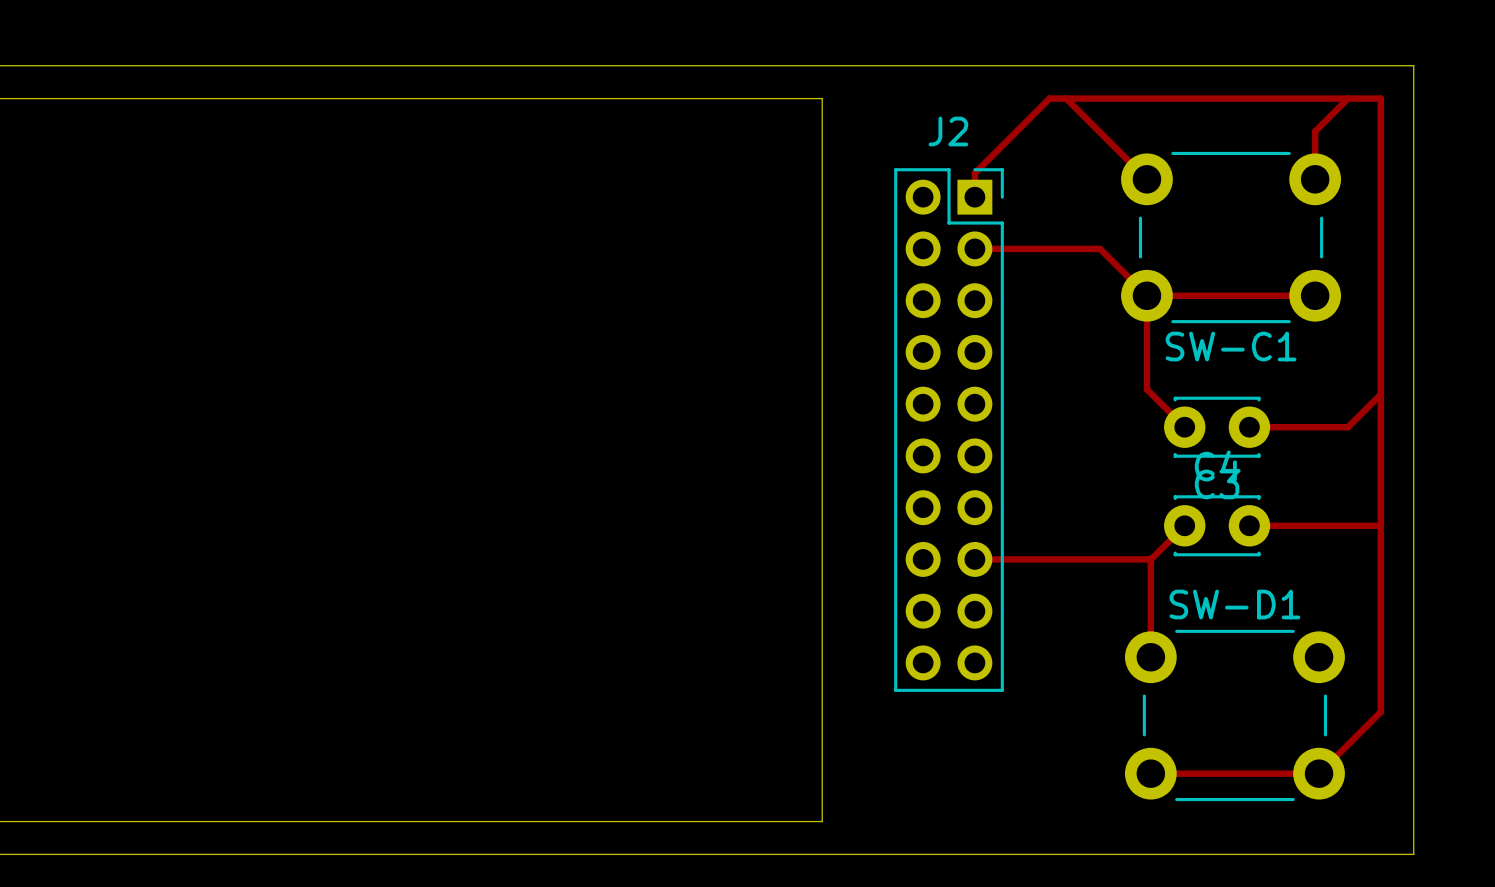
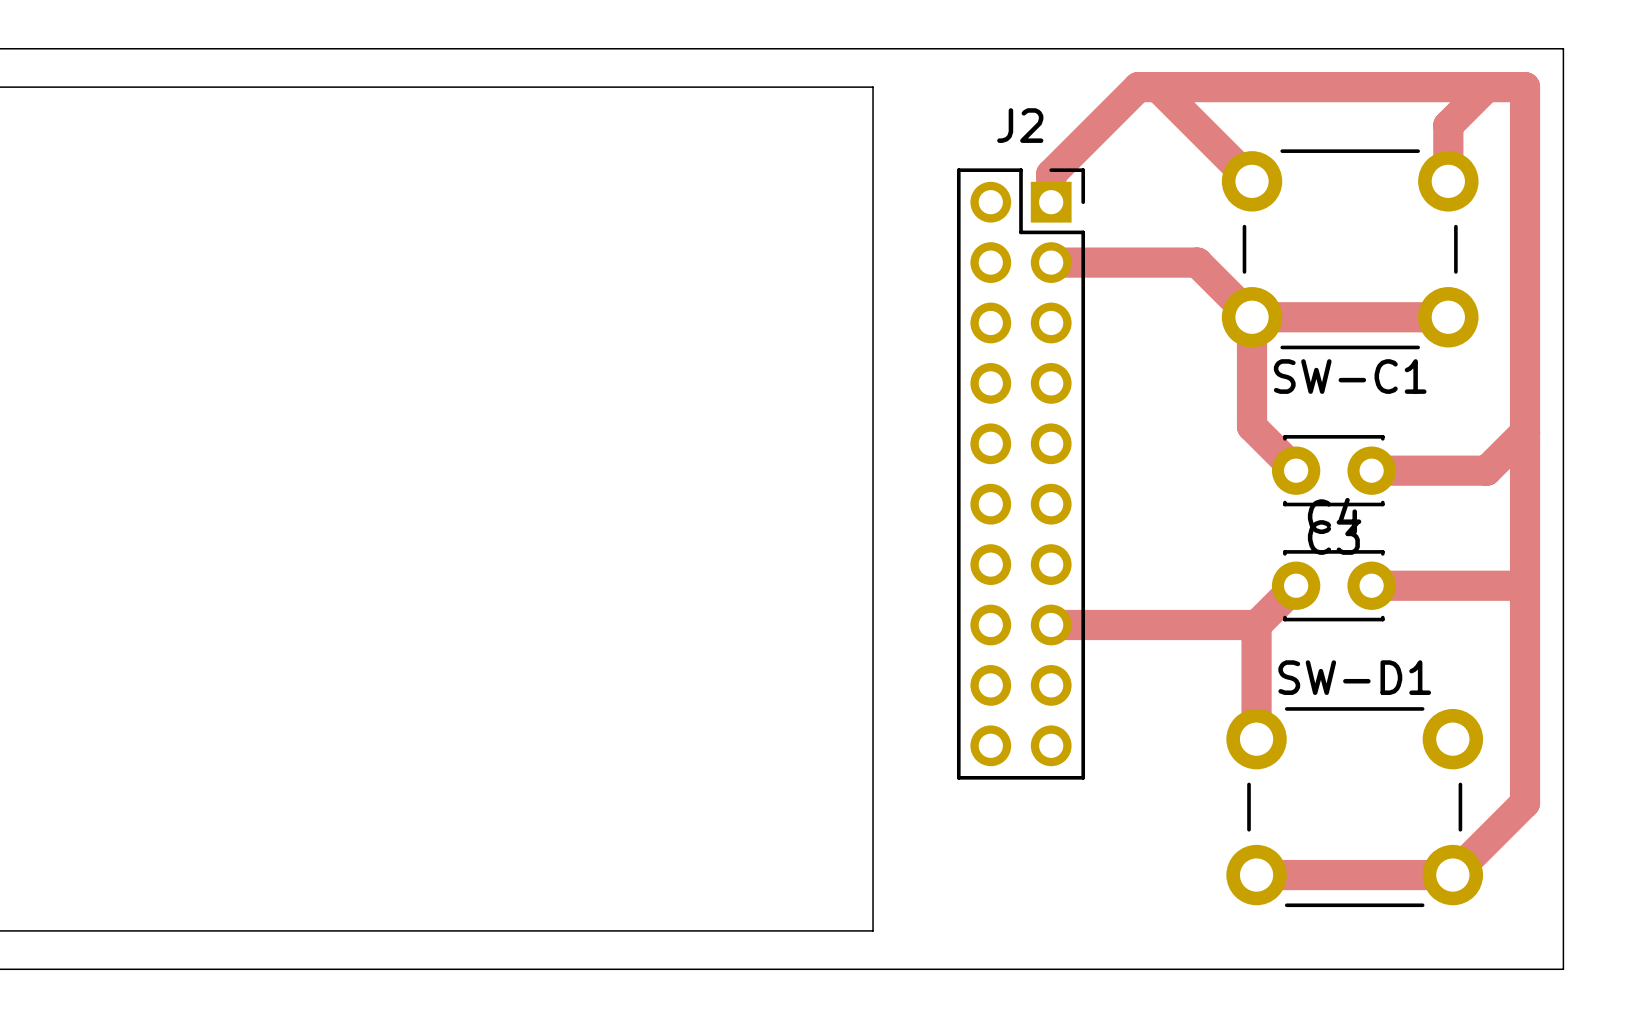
top track width: thin (1066, 98) (1146, 179) -> thick (1157, 87) (1252, 181)
top track width: thin (1348, 98) (1315, 131) (1315, 179) -> thick (1486, 87) (1448, 125) (1448, 181)
top track width: thin (974, 197) (974, 173) (1049, 98) (1380, 98) (1380, 711) (1319, 773) (1150, 773) -> thick (1051, 202) (1051, 174) (1138, 87) (1525, 87) (1525, 802) (1452, 875) (1256, 875)
top track width: thin (974, 248) (1100, 248) (1146, 295) -> thick (1051, 262) (1197, 262) (1252, 317)
top track width: thin (1146, 295) (1315, 295) -> thick (1252, 317) (1448, 317)
top track width: thin (1146, 295) (1146, 389) (1184, 427) -> thick (1252, 317) (1252, 426) (1296, 470)
top track width: thin (1380, 394) (1348, 427) (1249, 427) -> thick (1525, 432) (1486, 470) (1371, 470)
top track width: thin (1184, 525) (1151, 559) (974, 559) -> thick (1296, 585) (1256, 625) (1051, 625)
top track width: thin (1249, 525) (1380, 525) -> thick (1371, 585) (1525, 585)
top track width: thin (1150, 558) (1150, 657) -> thick (1256, 624) (1256, 739)

